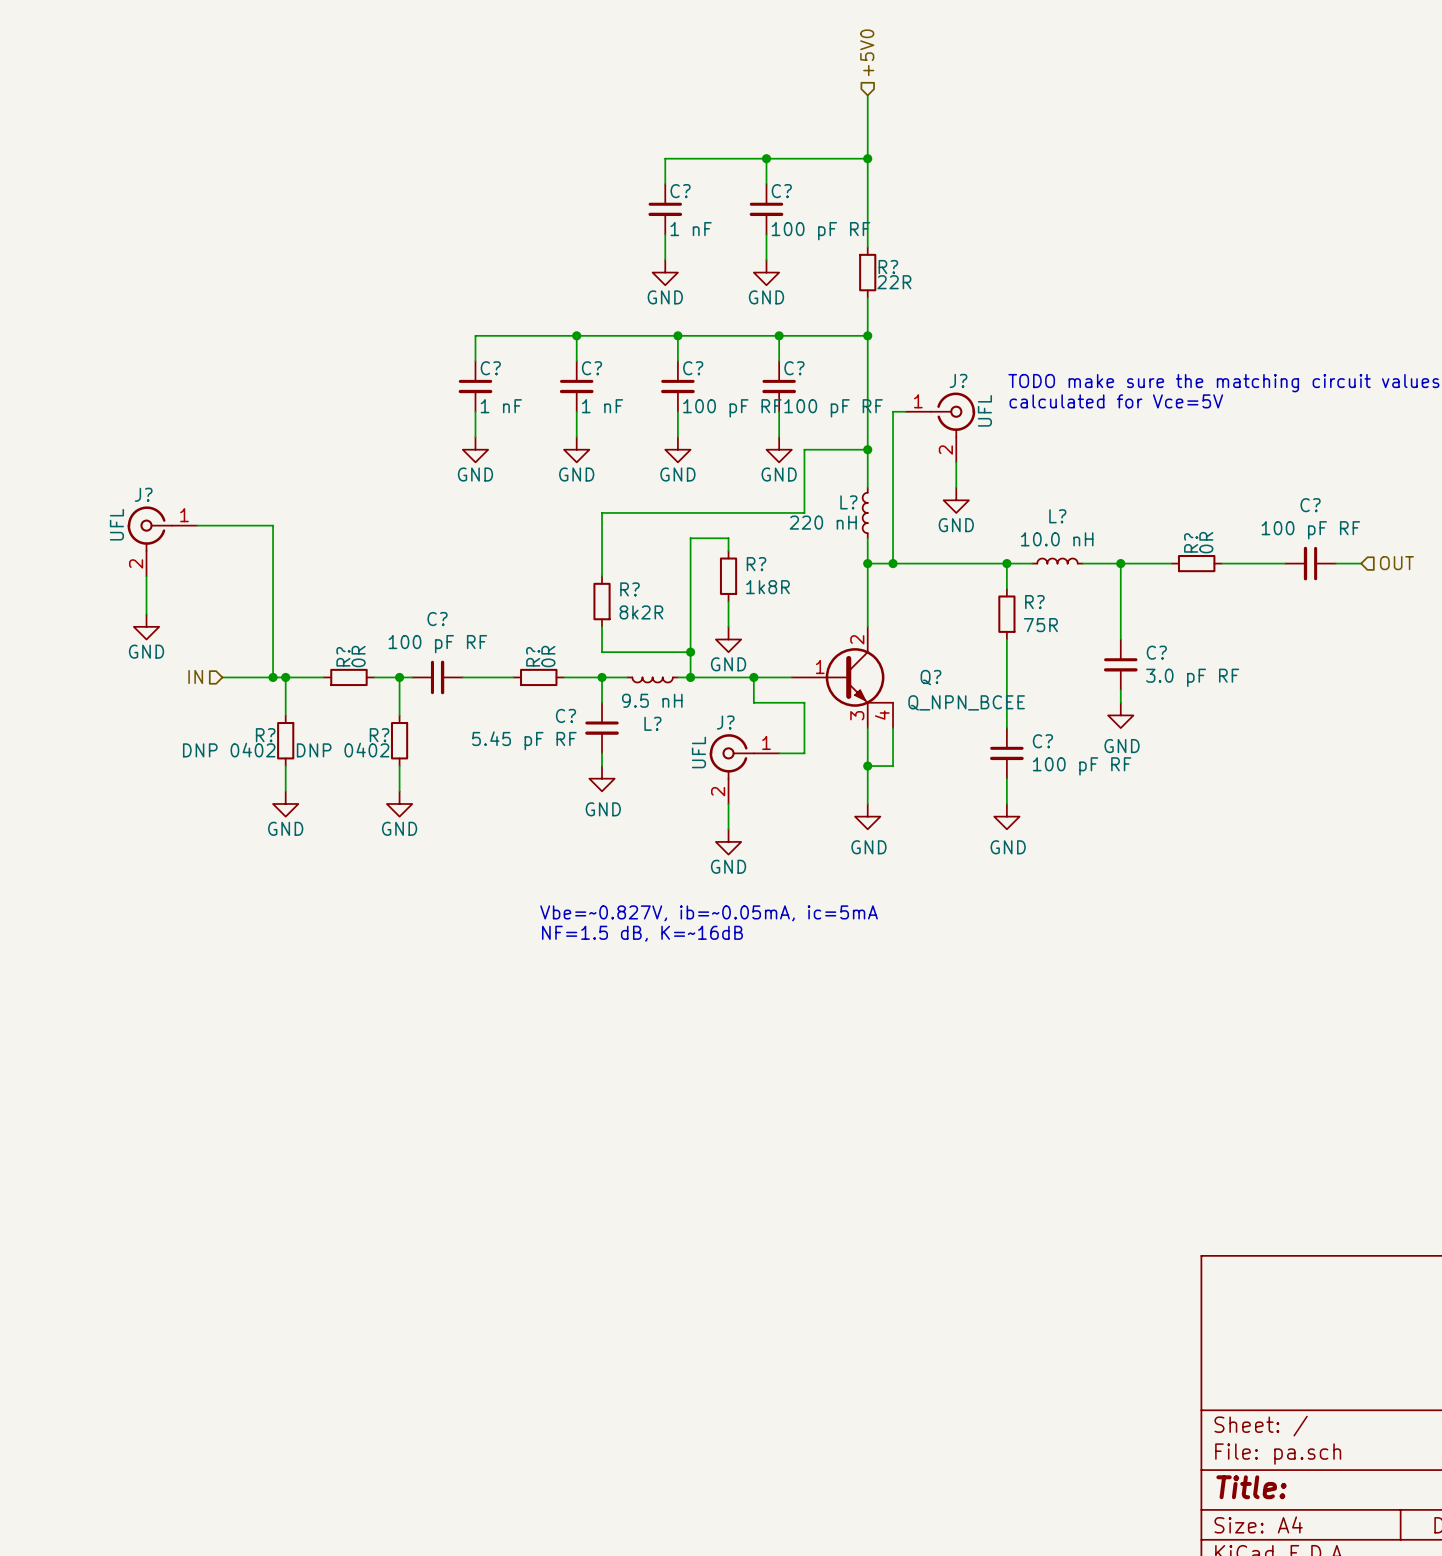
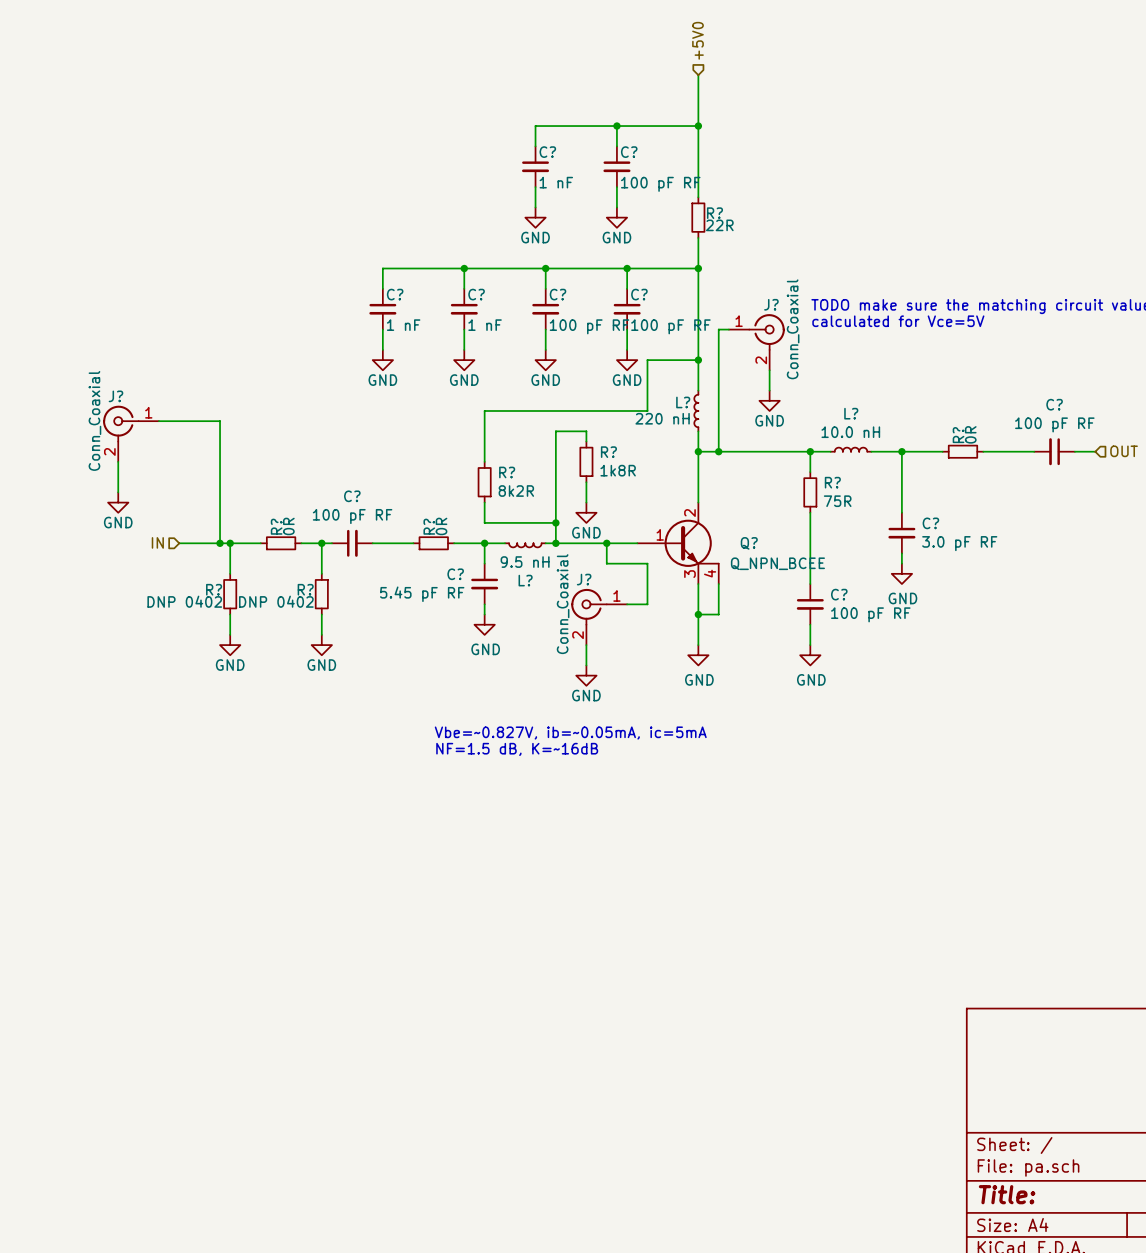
J? value: UFL (984, 410) -> Conn_Coaxial (793, 329)
J? value: UFL (116, 524) -> Conn_Coaxial (94, 420)
J? value: UFL (698, 752) -> Conn_Coaxial (563, 604)

